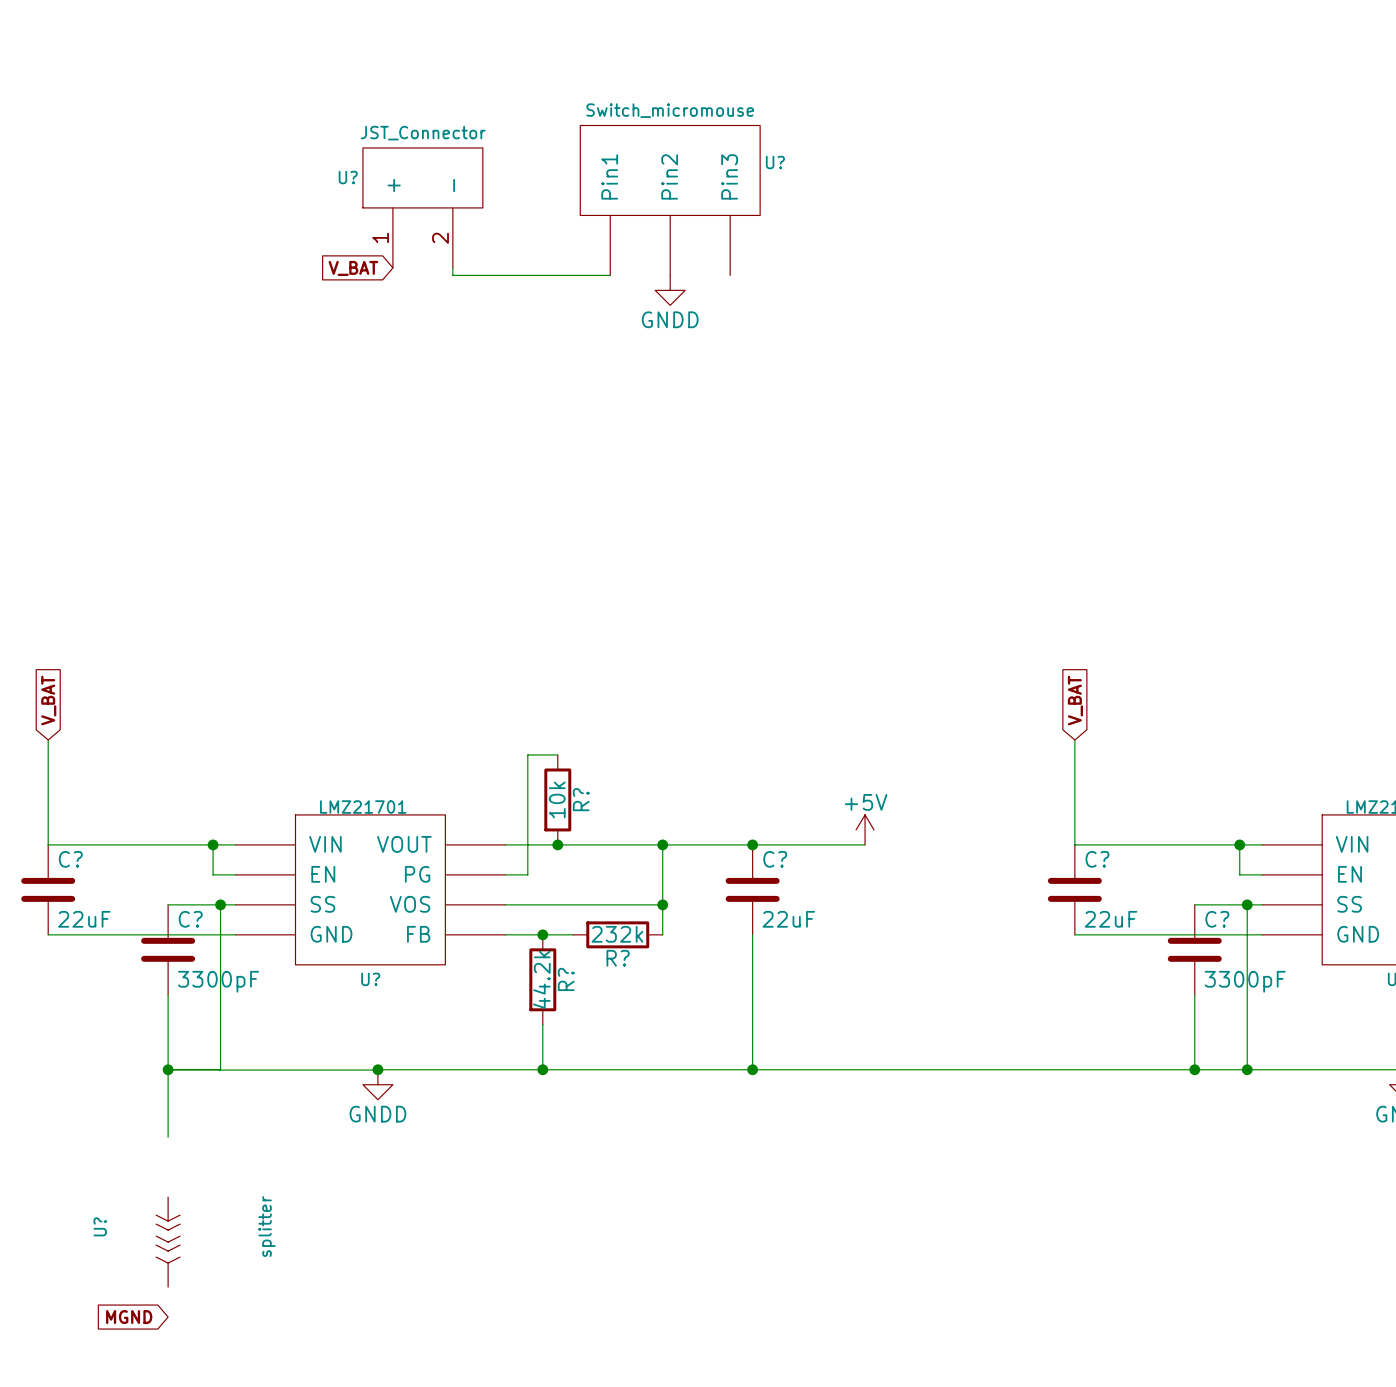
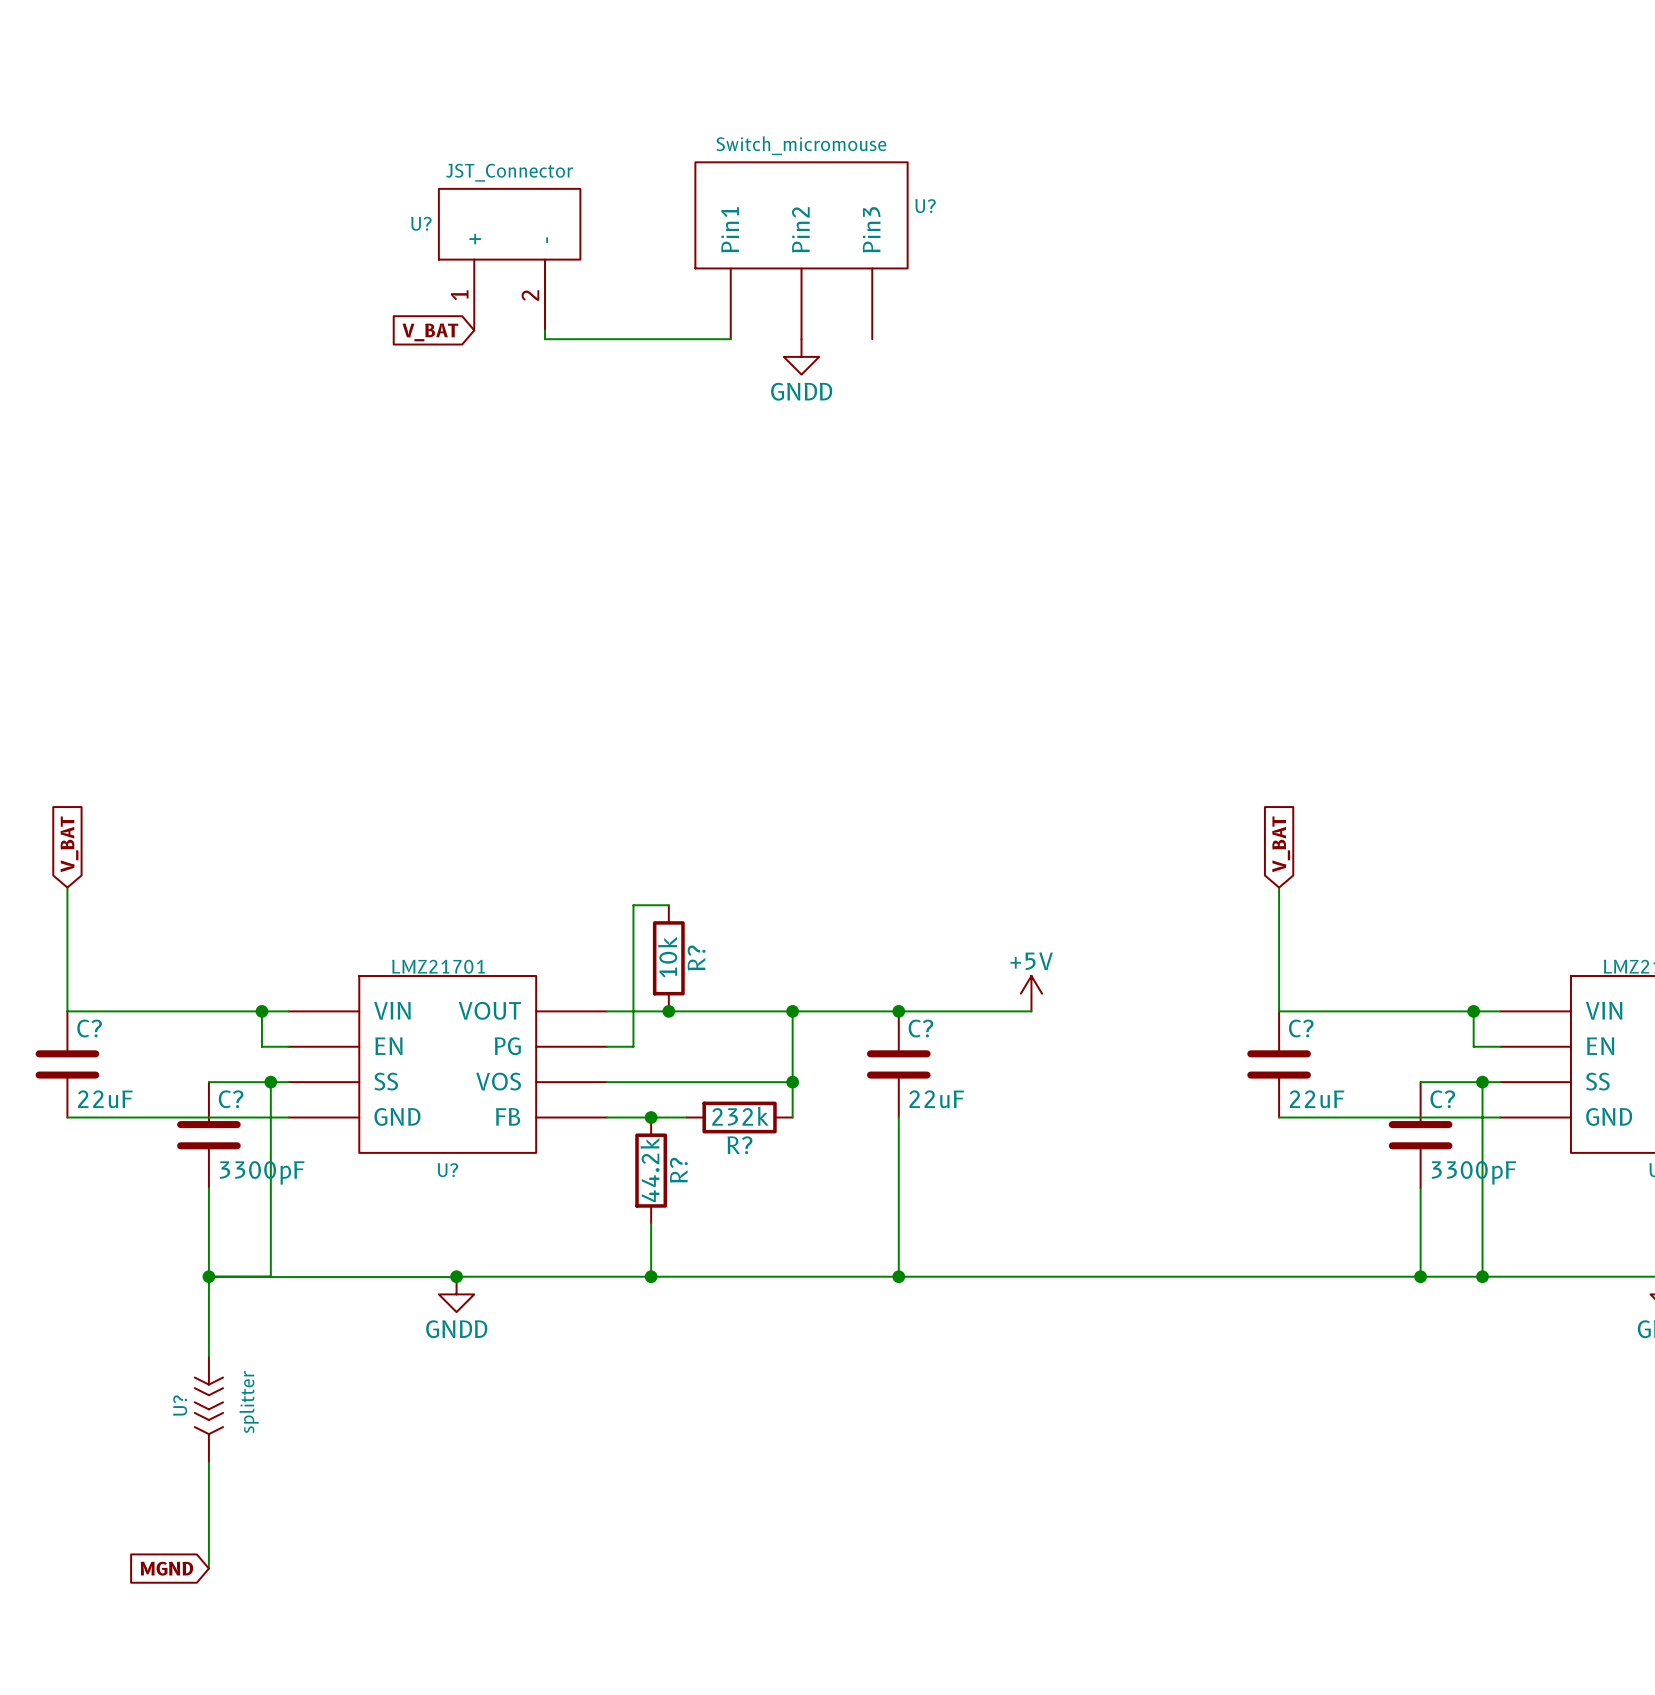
U? name position: U? (100, 1226) -> U? (180, 1405)
U? value position: splitter (267, 1226) -> splitter (249, 1402)
wire: none -> (208, 1462) (208, 1568)
U? position: (168, 1242) -> (208, 1409)

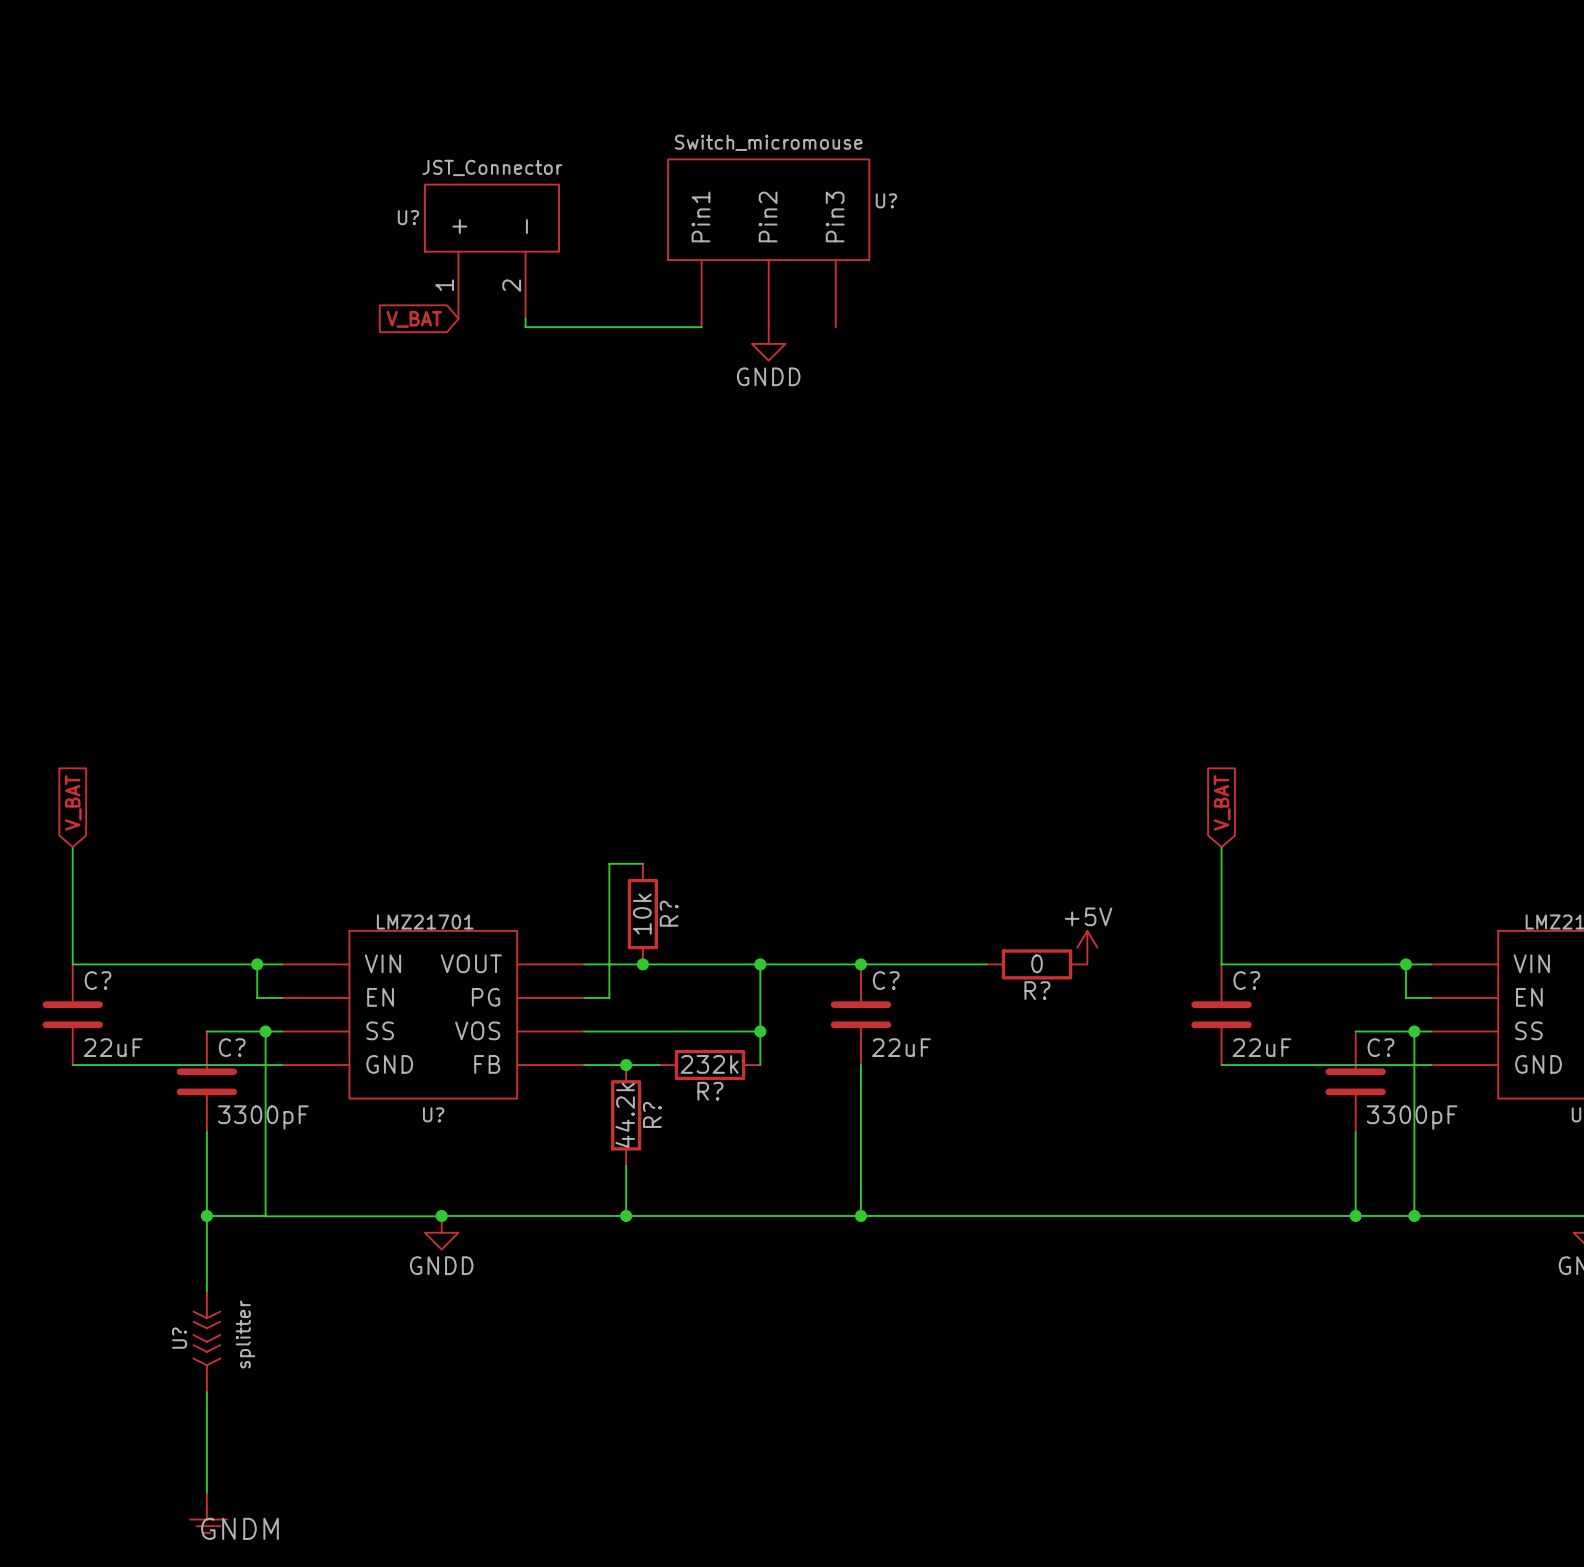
power symbol position: +5V (1031, 993) -> +5V (1087, 947)
R?: none -> 0 (1037, 964)
global label: MGND (166, 1568) -> none
part: none -> GNDM (208, 1512)

